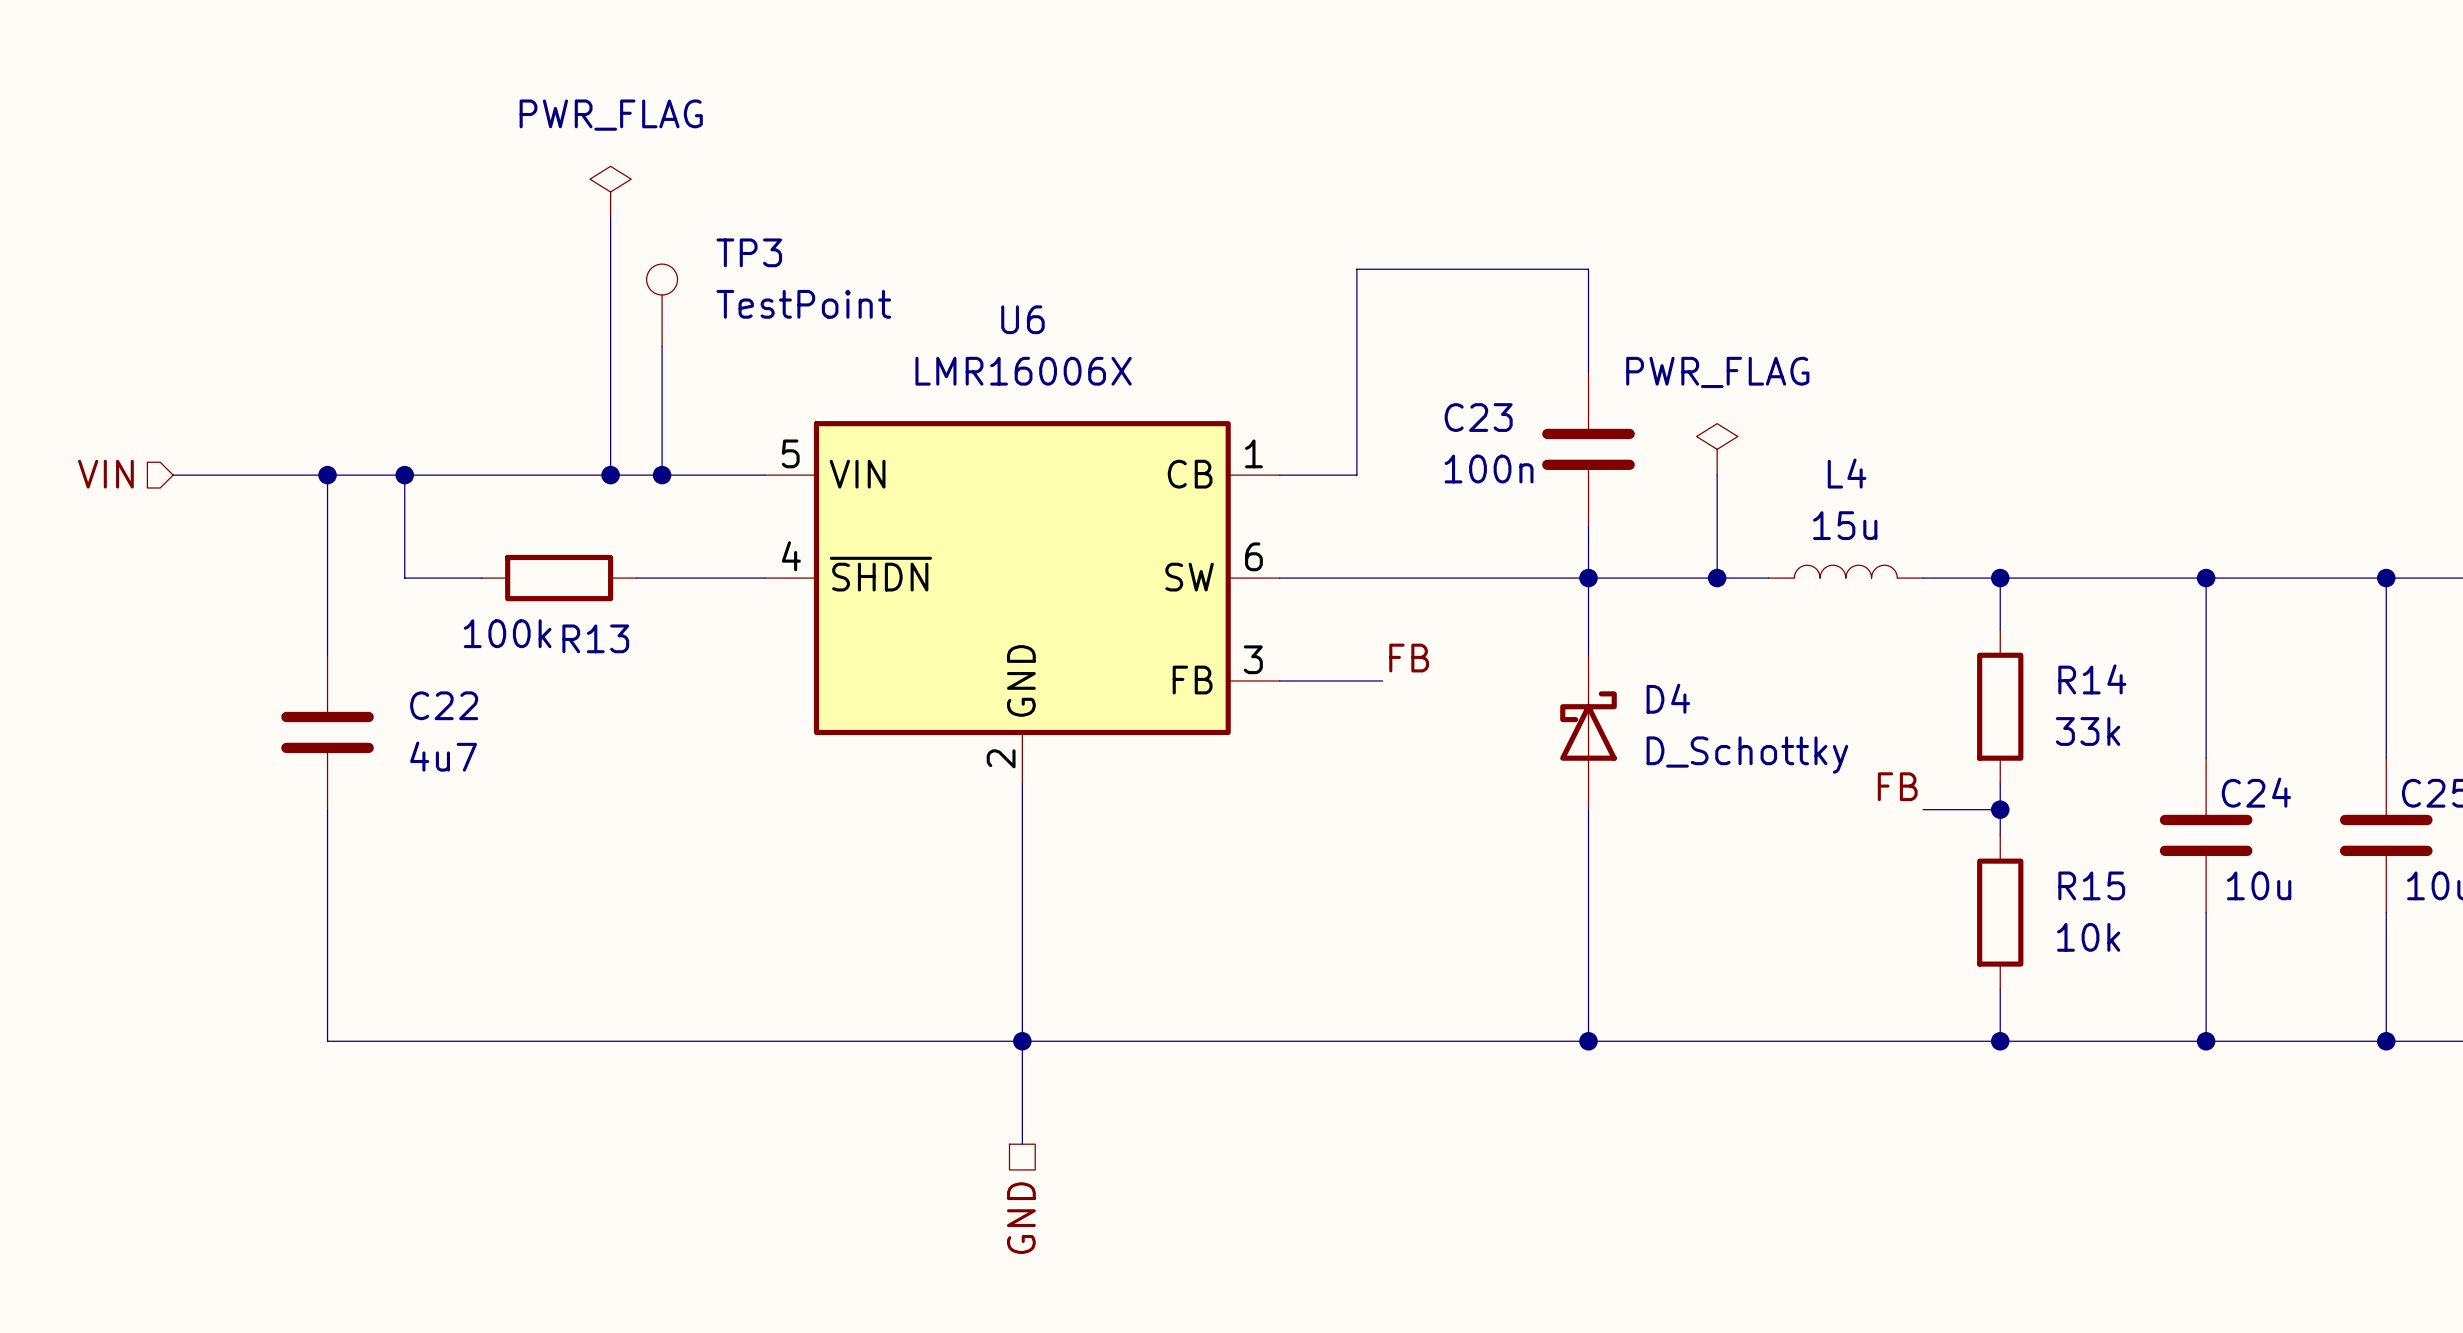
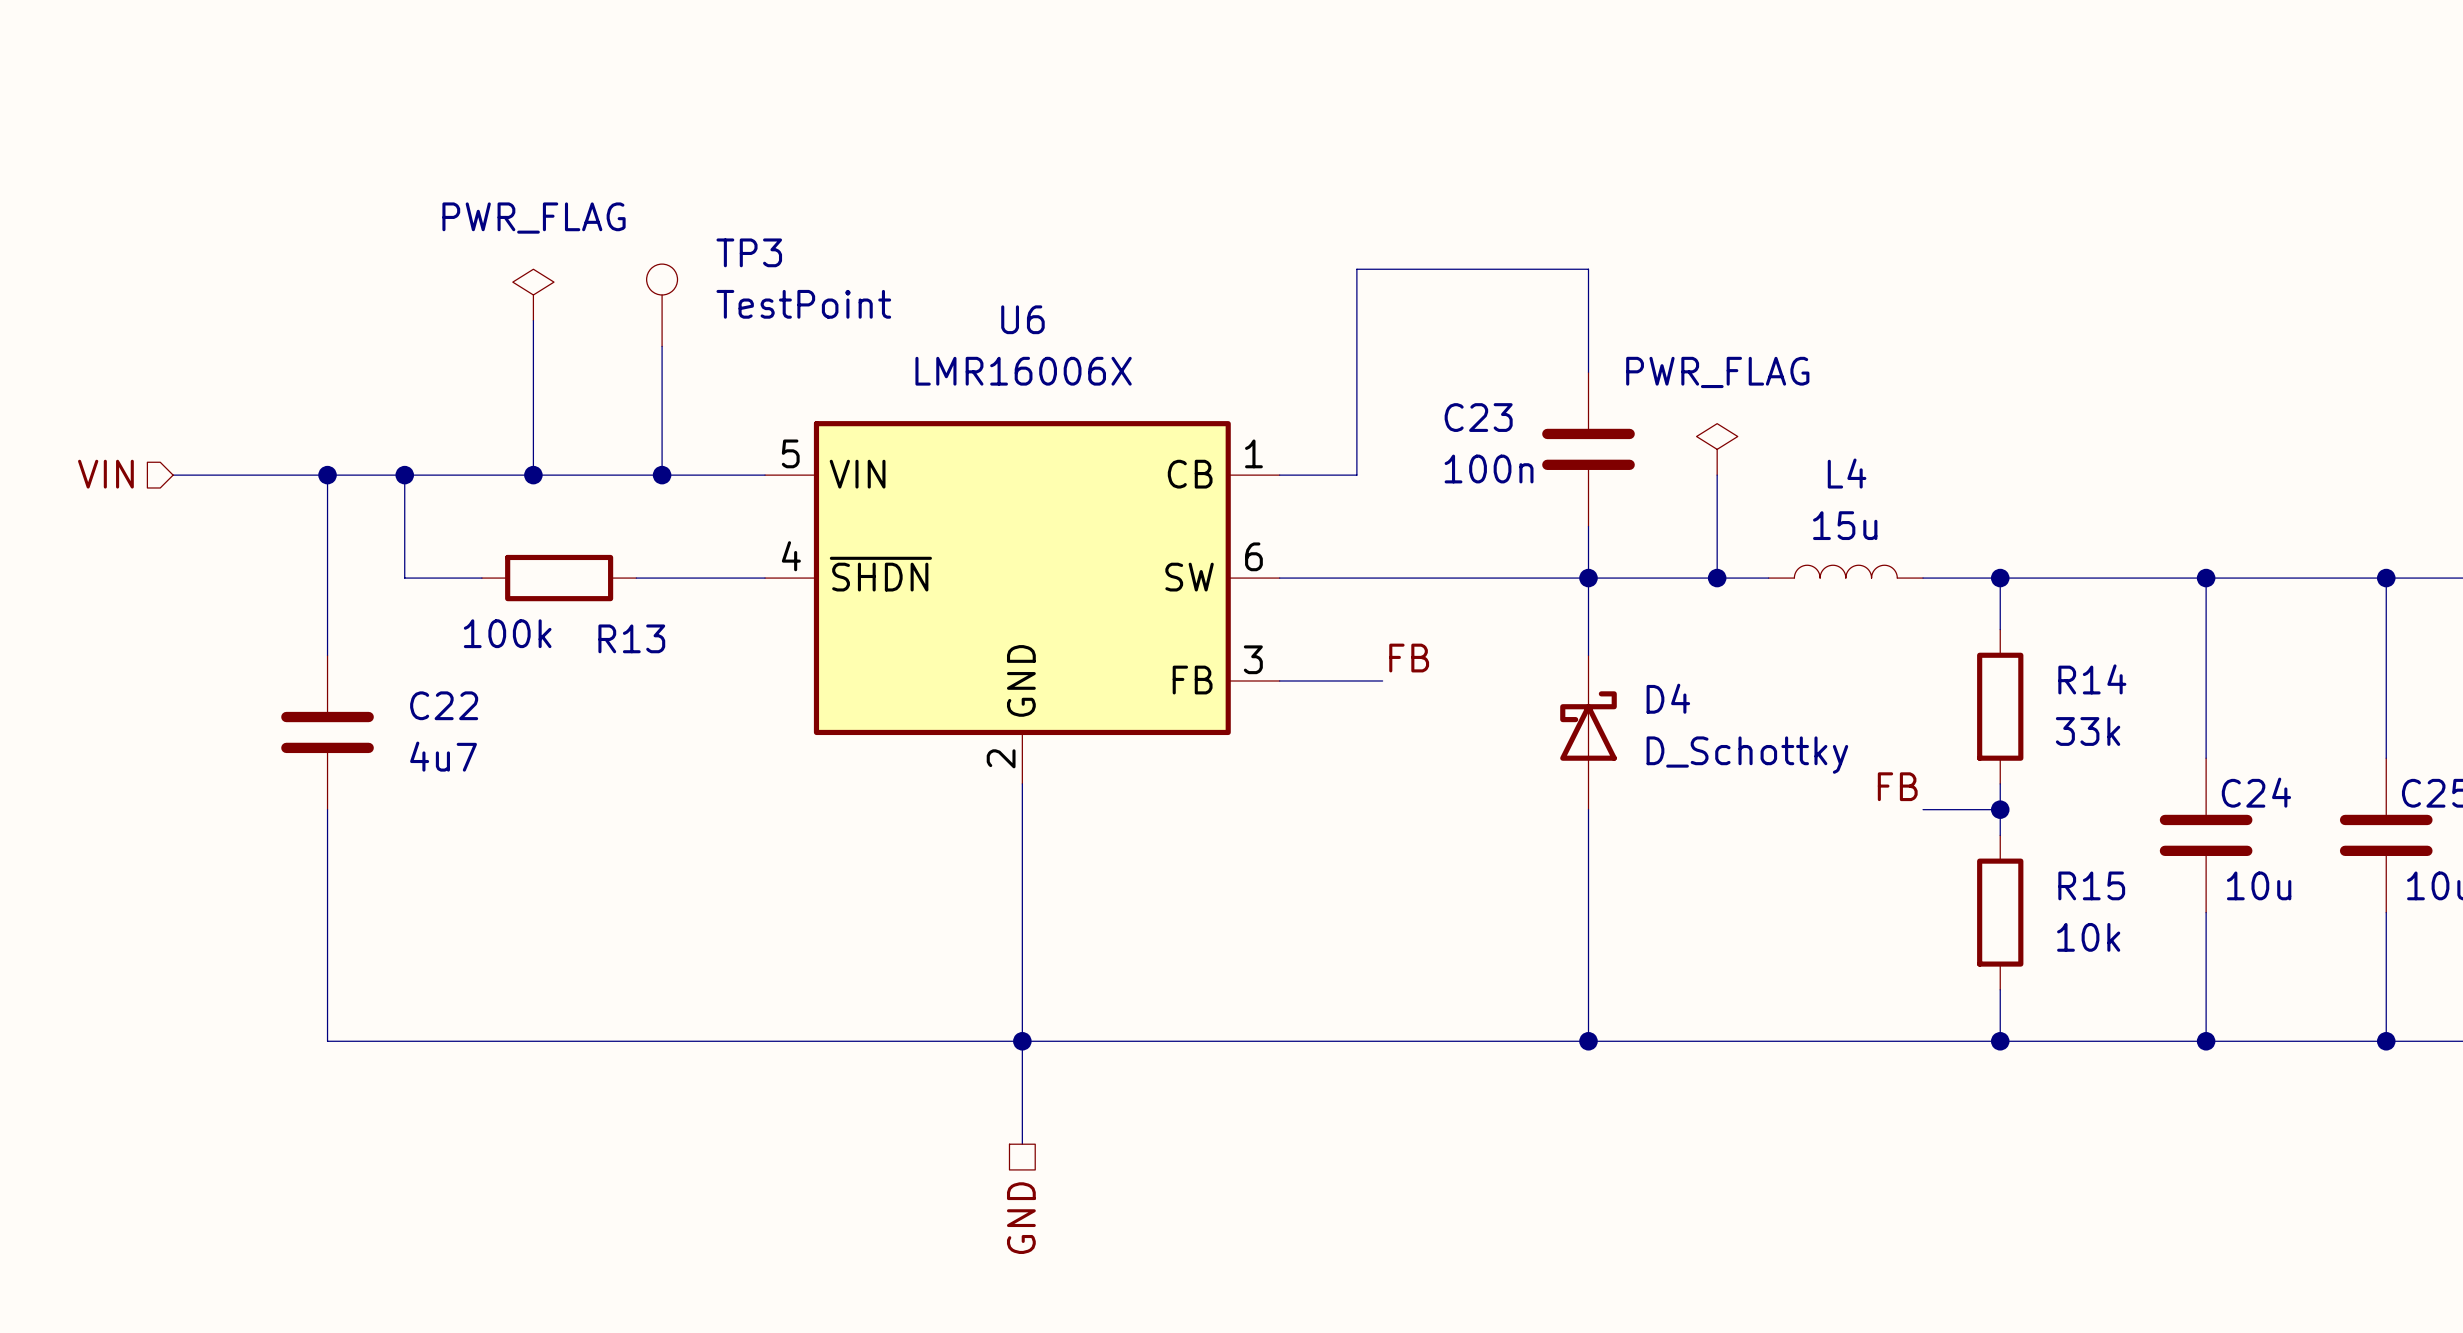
power symbol position: PWR_FLAG (610, 192) -> PWR_FLAG (533, 294)
wire: (610, 217) (610, 475) -> none
wire: none -> (533, 320) (533, 475)
junction position: (610, 475) -> (533, 475)
R13 name position: R13 (595, 638) -> R13 (631, 638)

